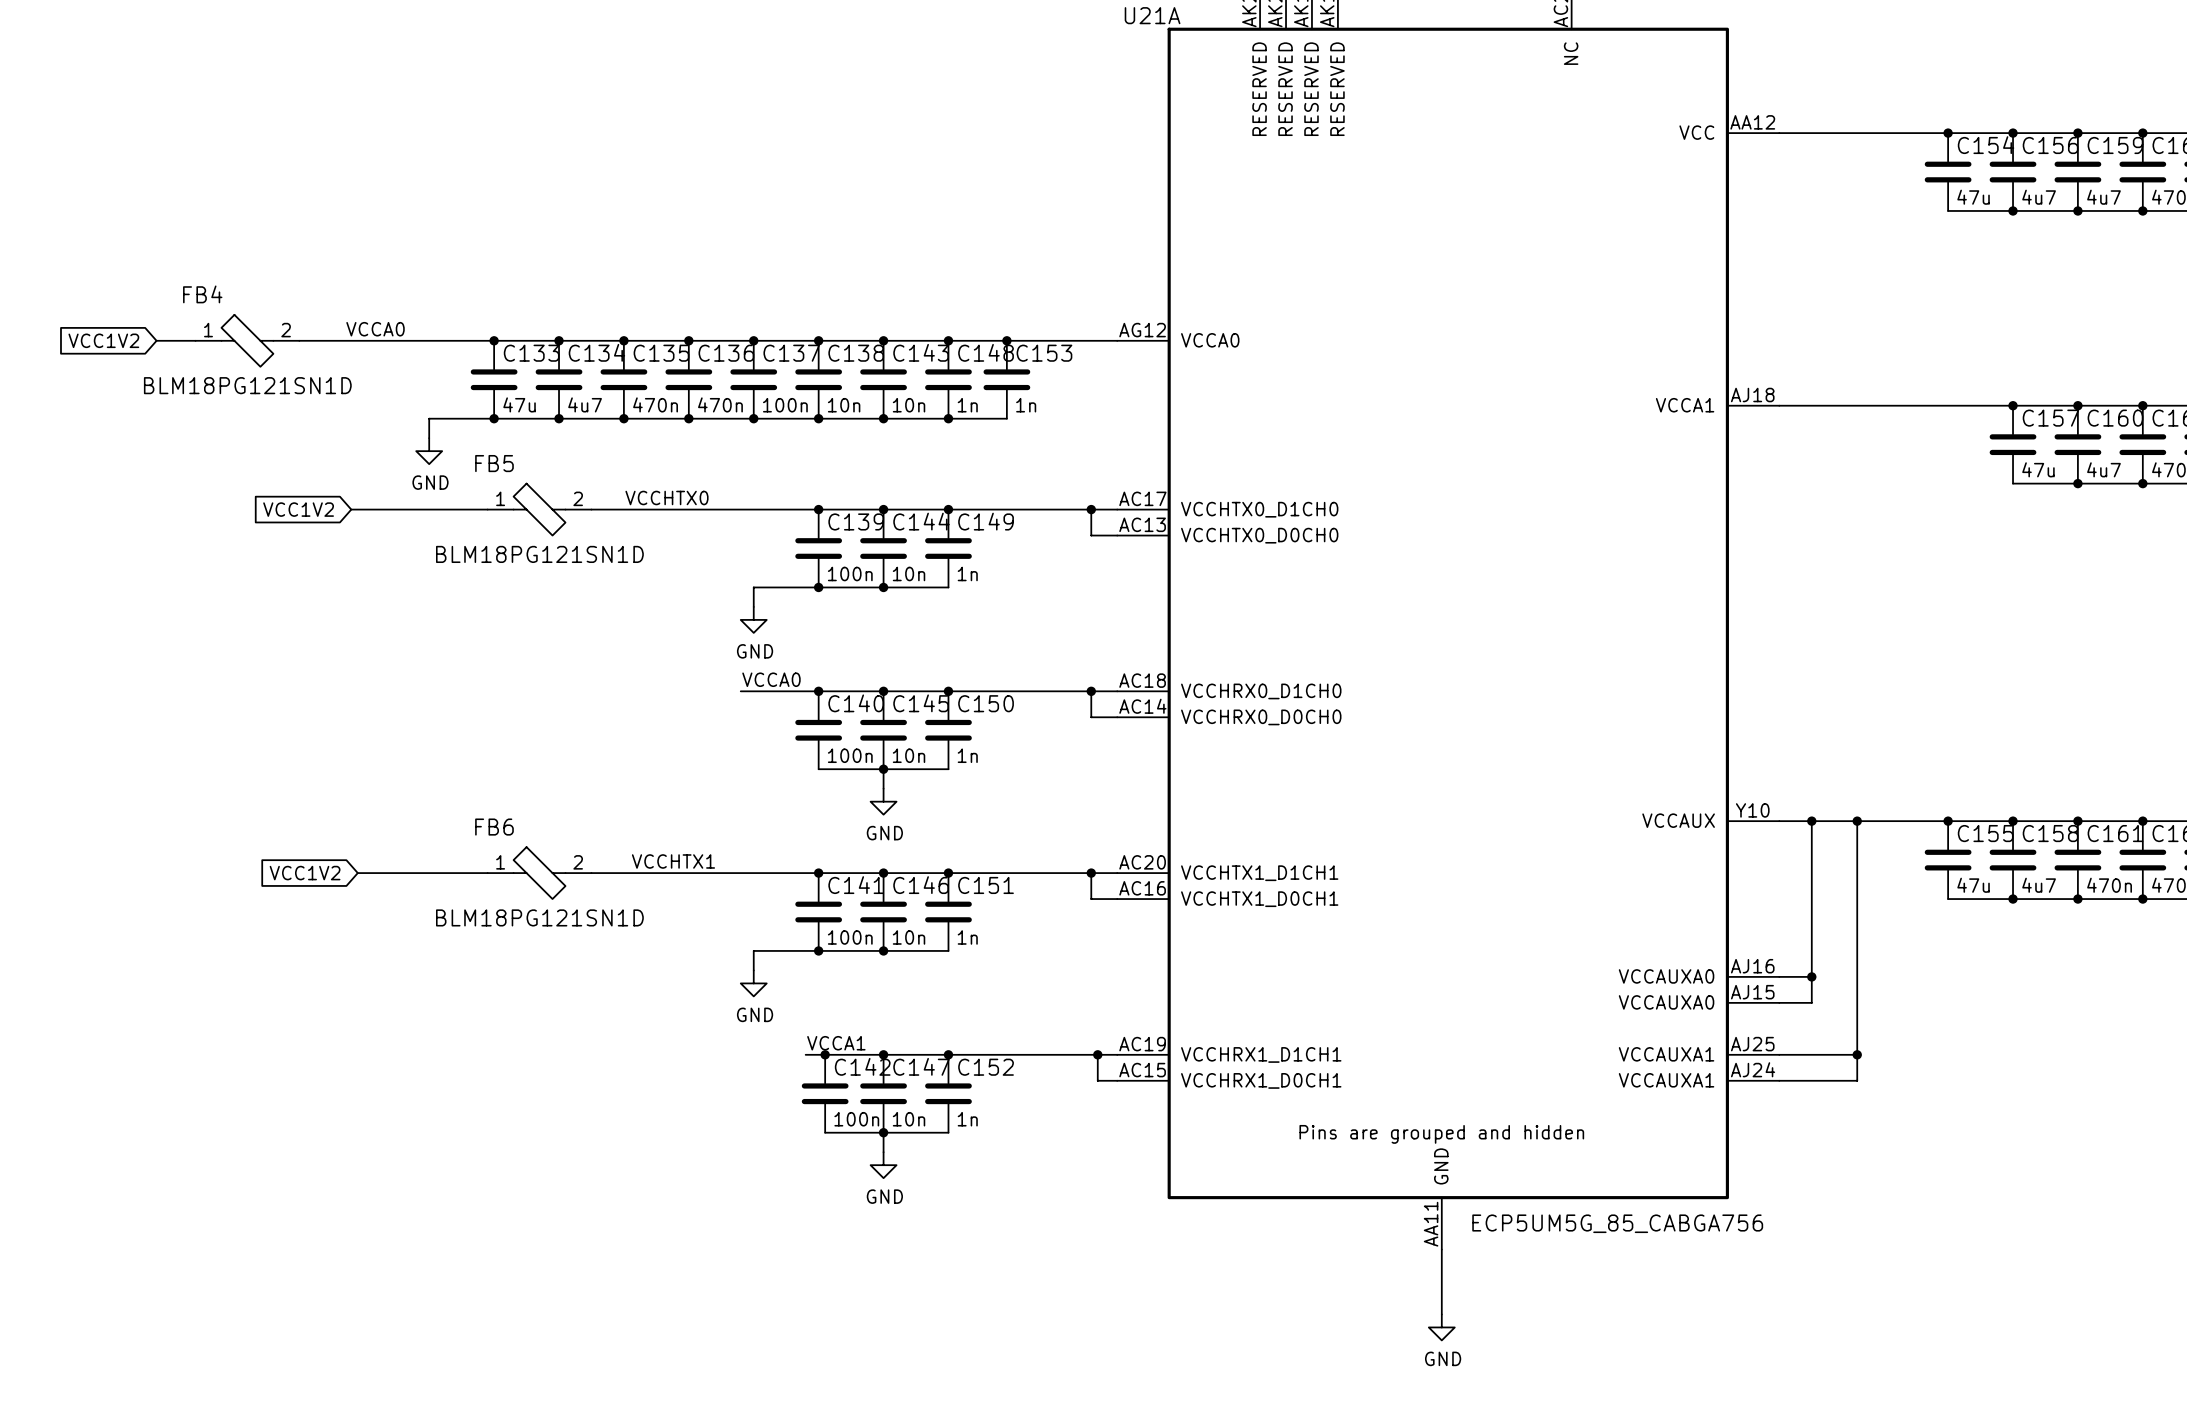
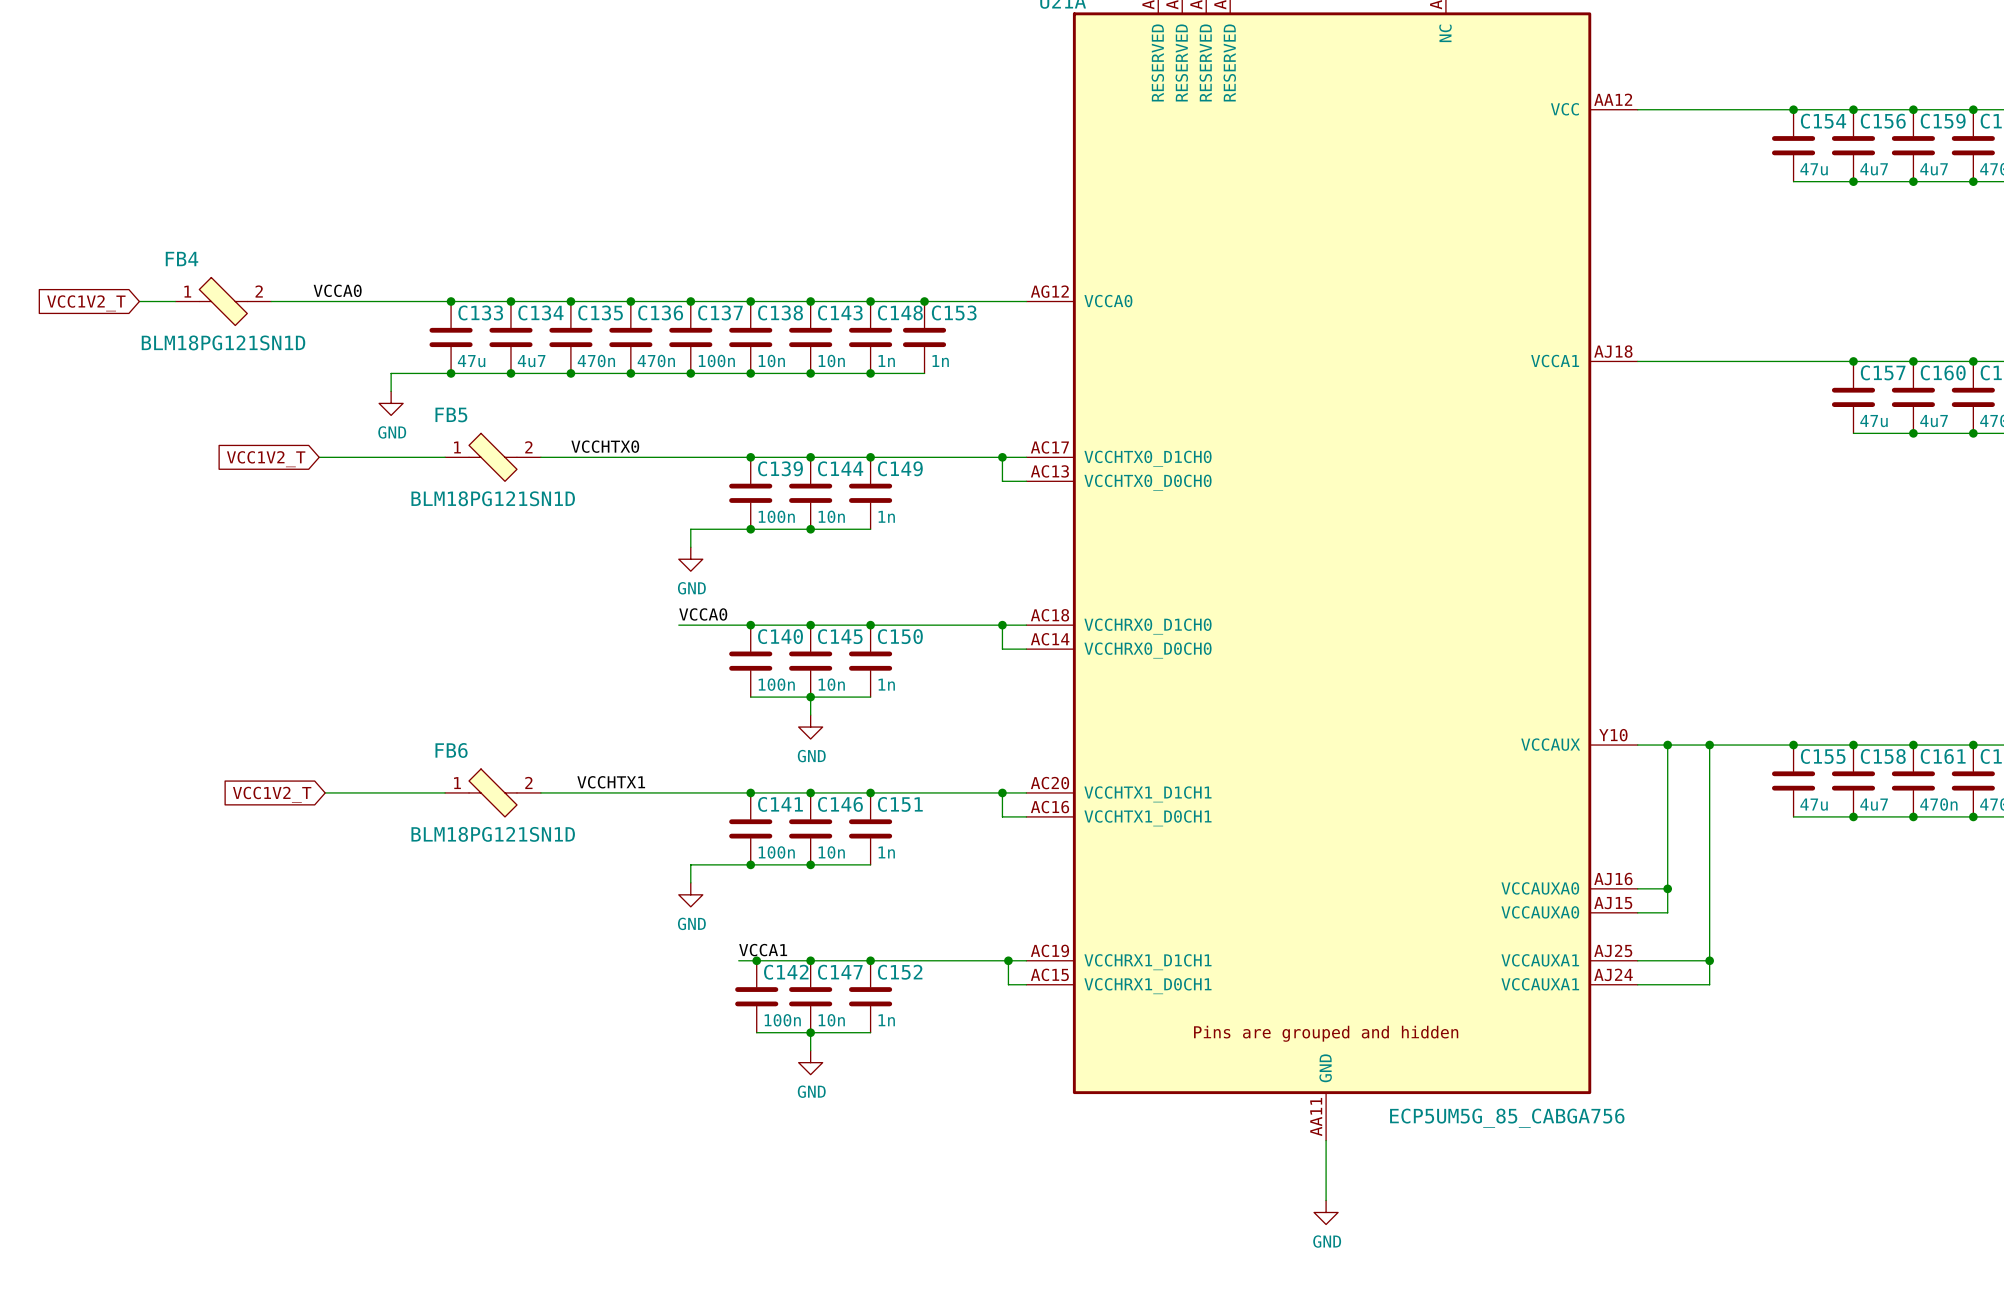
global label: VCC1V2 (103, 340) -> VCC1V2_T (86, 303)
global label: VCC1V2 (298, 509) -> VCC1V2_T (266, 459)
global label: VCC1V2 (305, 873) -> VCC1V2_T (272, 794)

